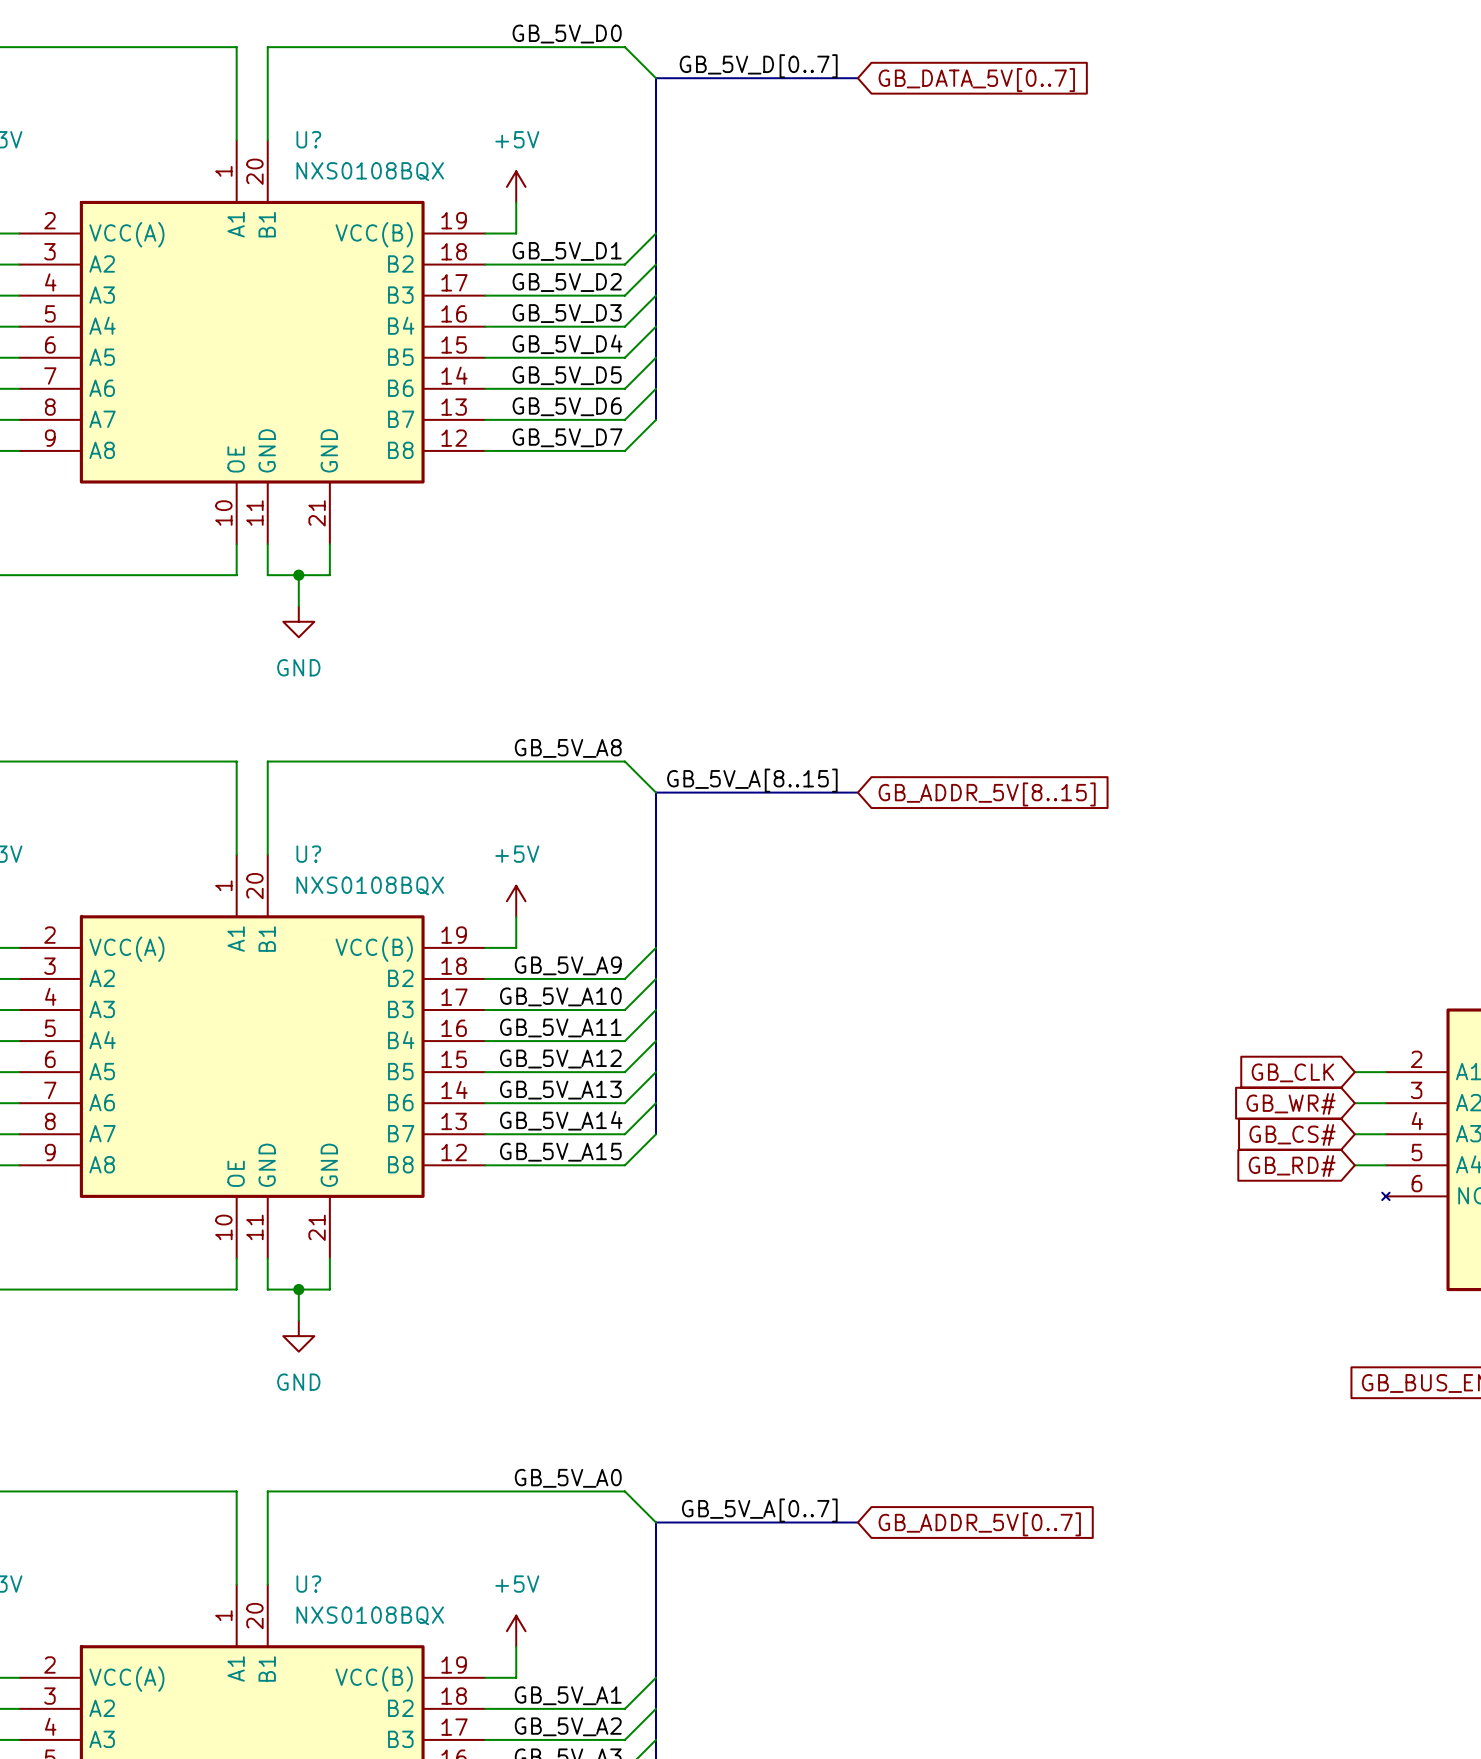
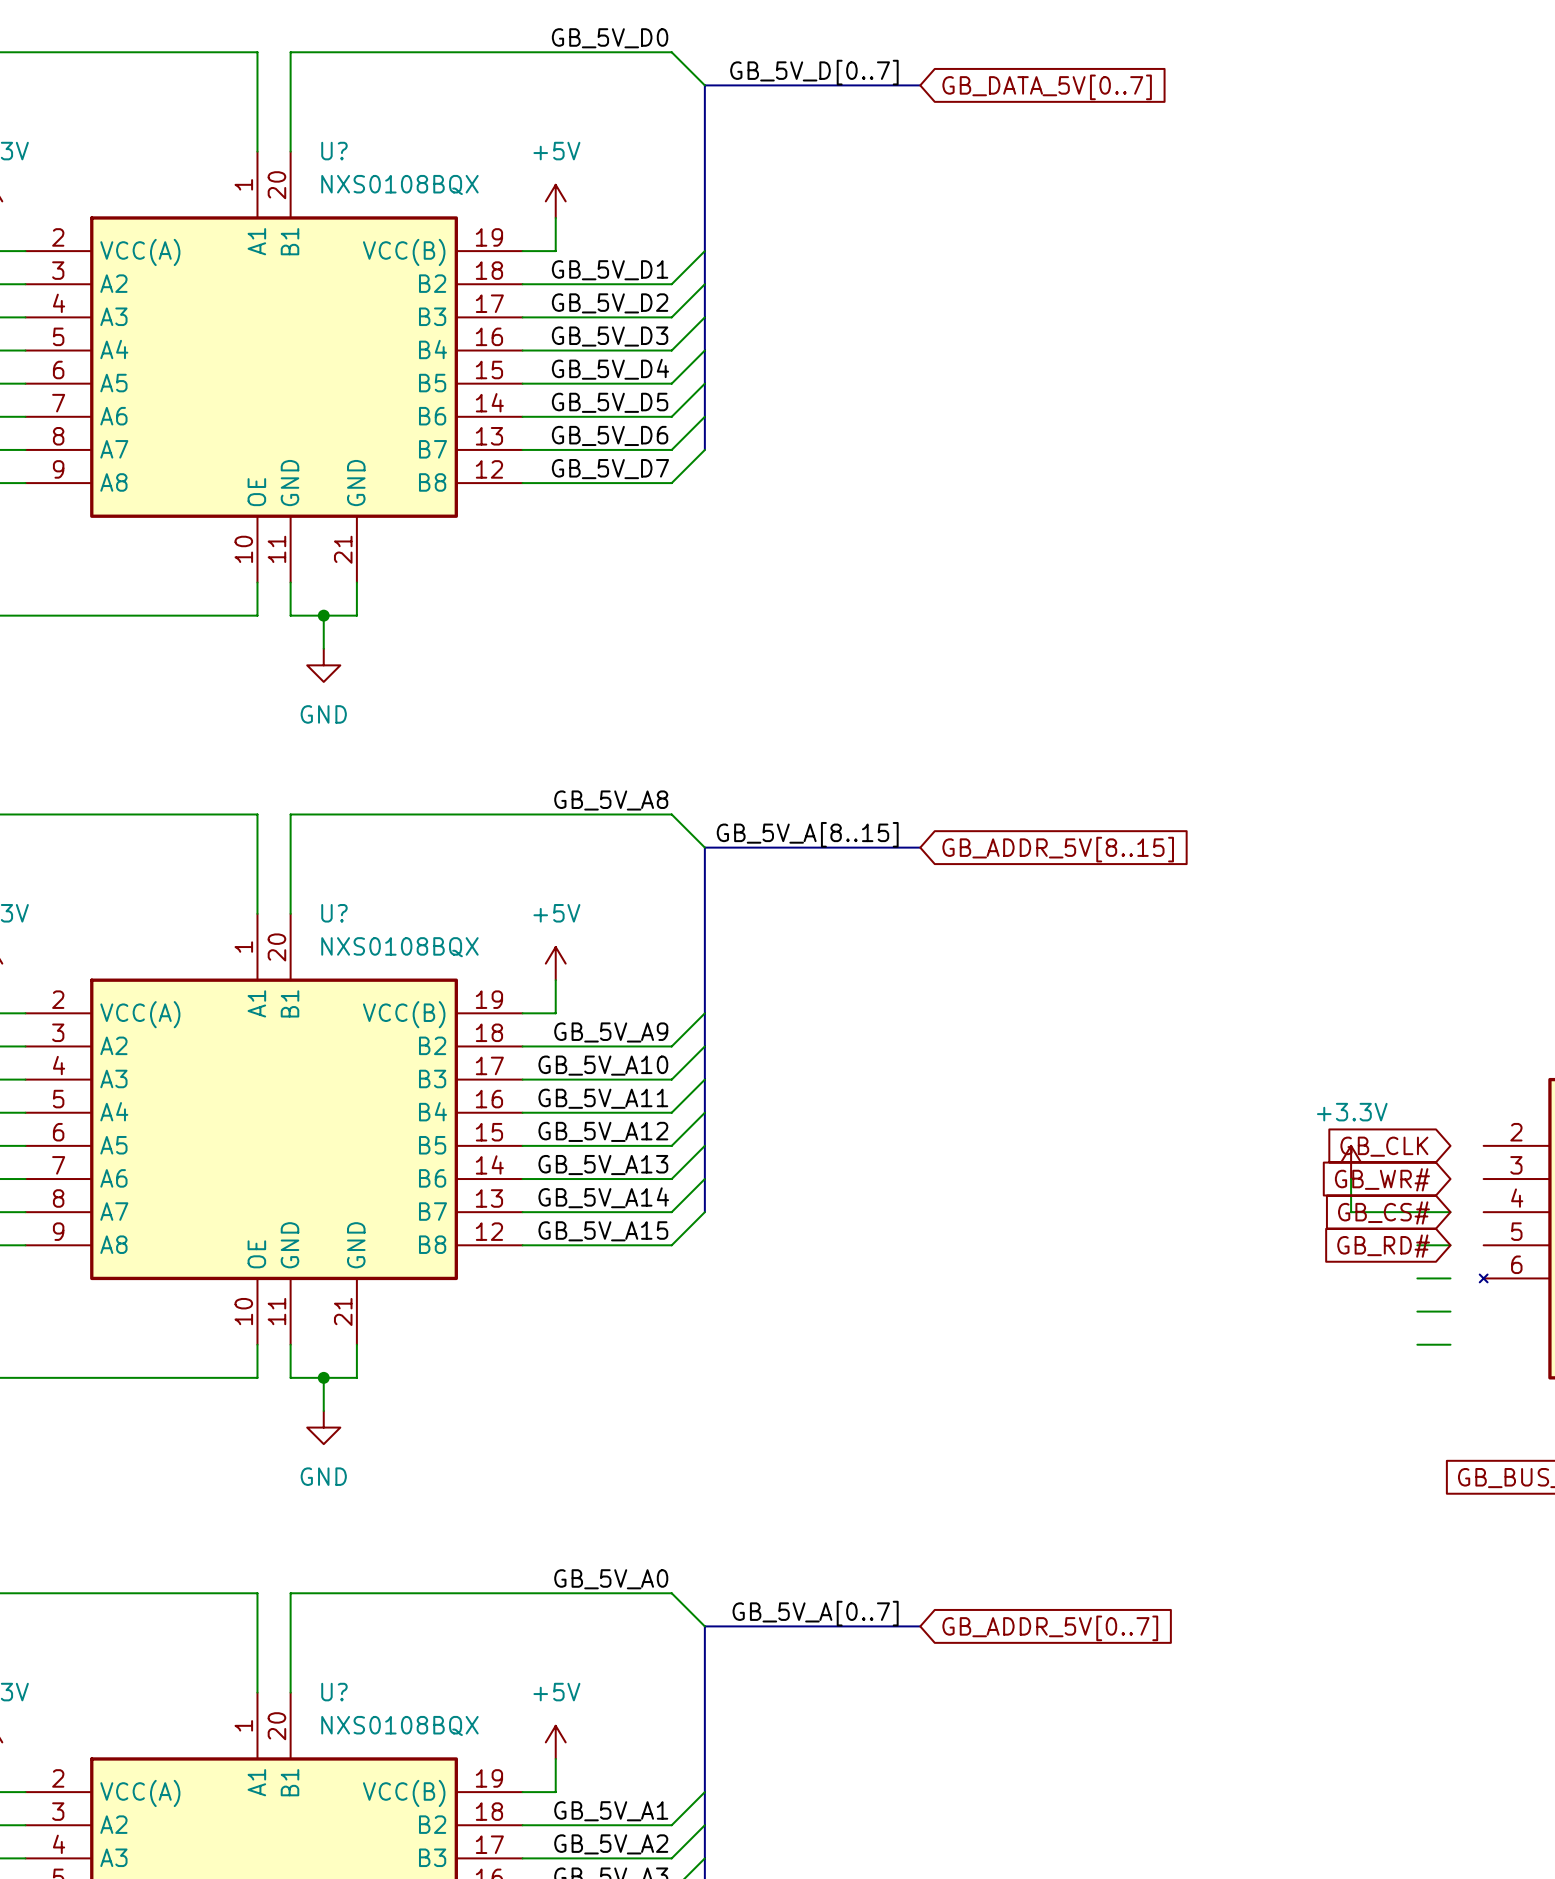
wire: (1354, 1072) (1385, 1072) -> (1417, 1311) (1450, 1311)
power symbol: none -> +3.3V (1351, 1162)
wire: (1354, 1103) (1385, 1103) -> (1417, 1278) (1450, 1278)
wire: (1354, 1134) (1385, 1134) -> (1450, 1212) (1351, 1212) (1351, 1179)
wire: (1354, 1165) (1385, 1165) -> (1450, 1245) (1417, 1245)
wire: none -> (1417, 1344) (1450, 1344)

